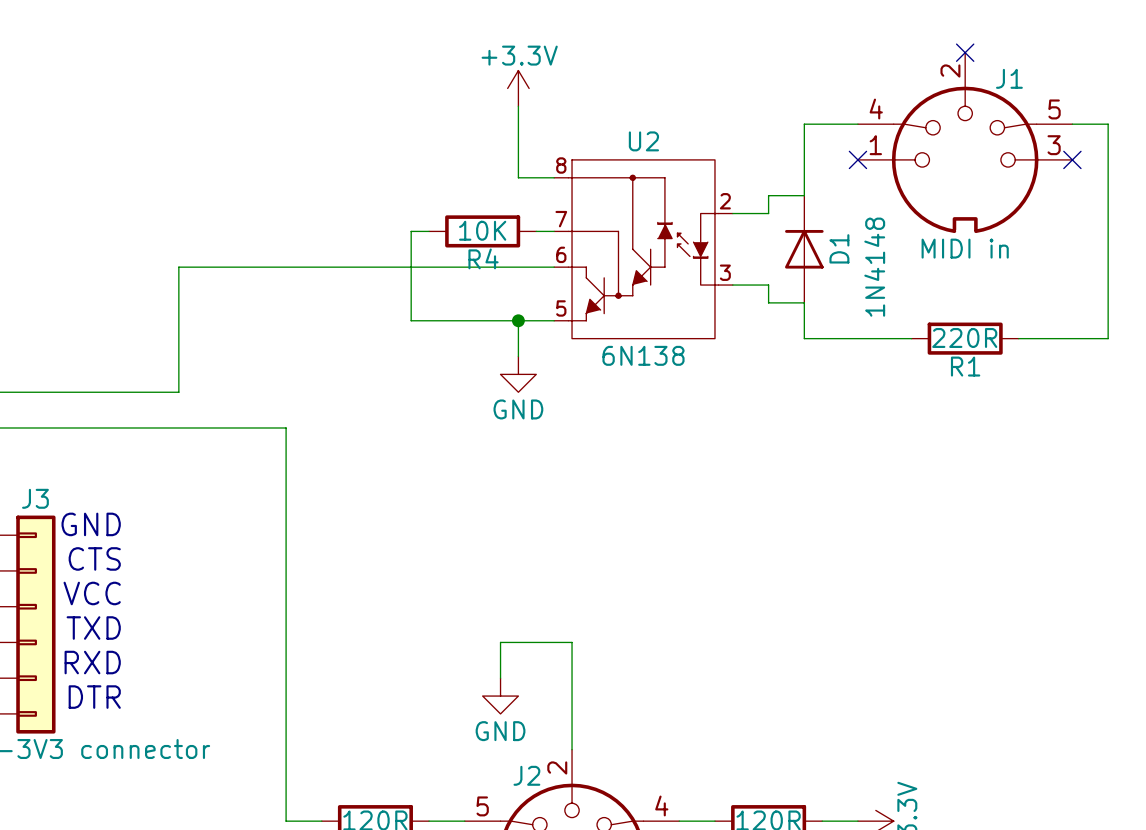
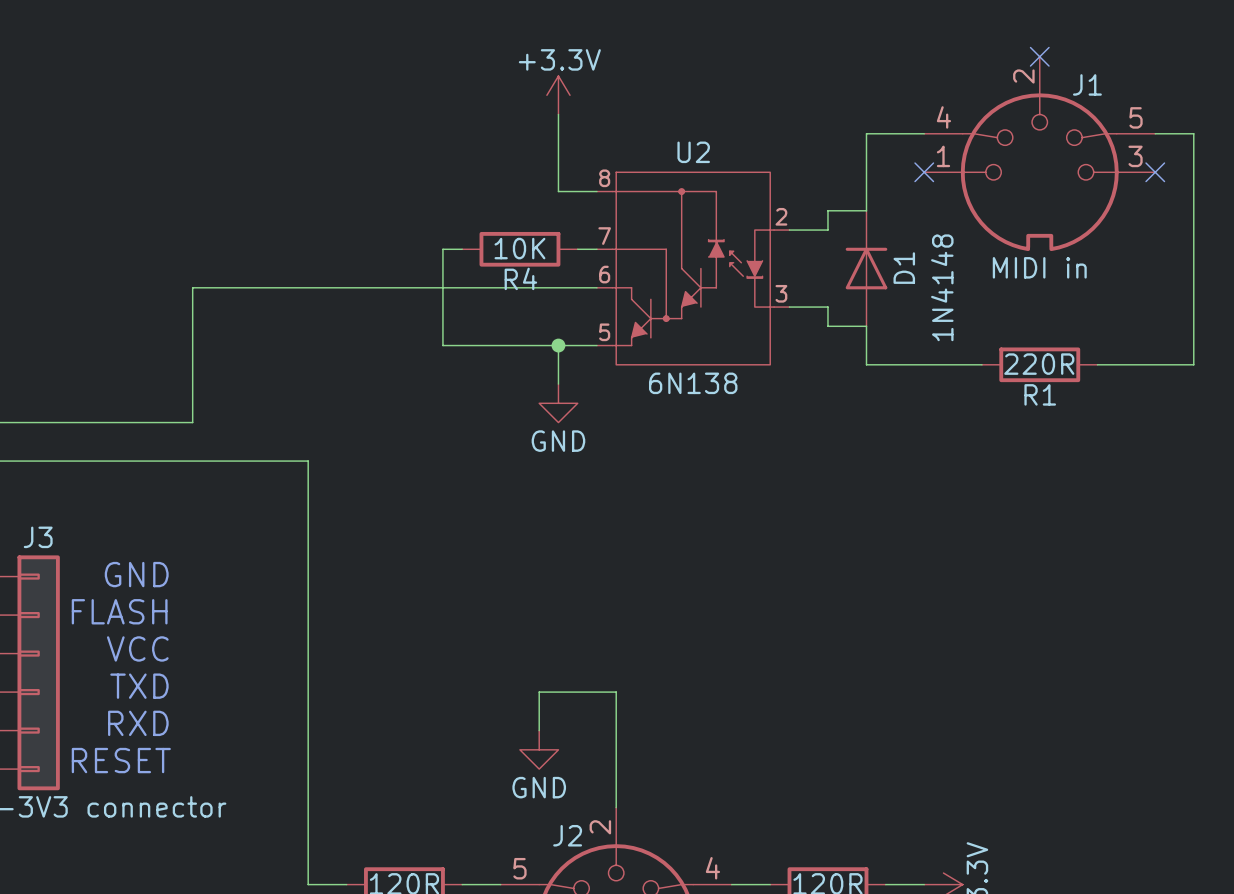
text position: GND (91, 524) -> GND (136, 574)
text: CTS (94, 558) -> none
text: none -> FLASH (119, 611)
text position: VCC (92, 593) -> VCC (137, 648)
text position: TXD (93, 628) -> TXD (139, 686)
text position: RXD (92, 662) -> RXD (138, 723)
text: DTR (94, 697) -> none
text: none -> RESET (121, 760)

